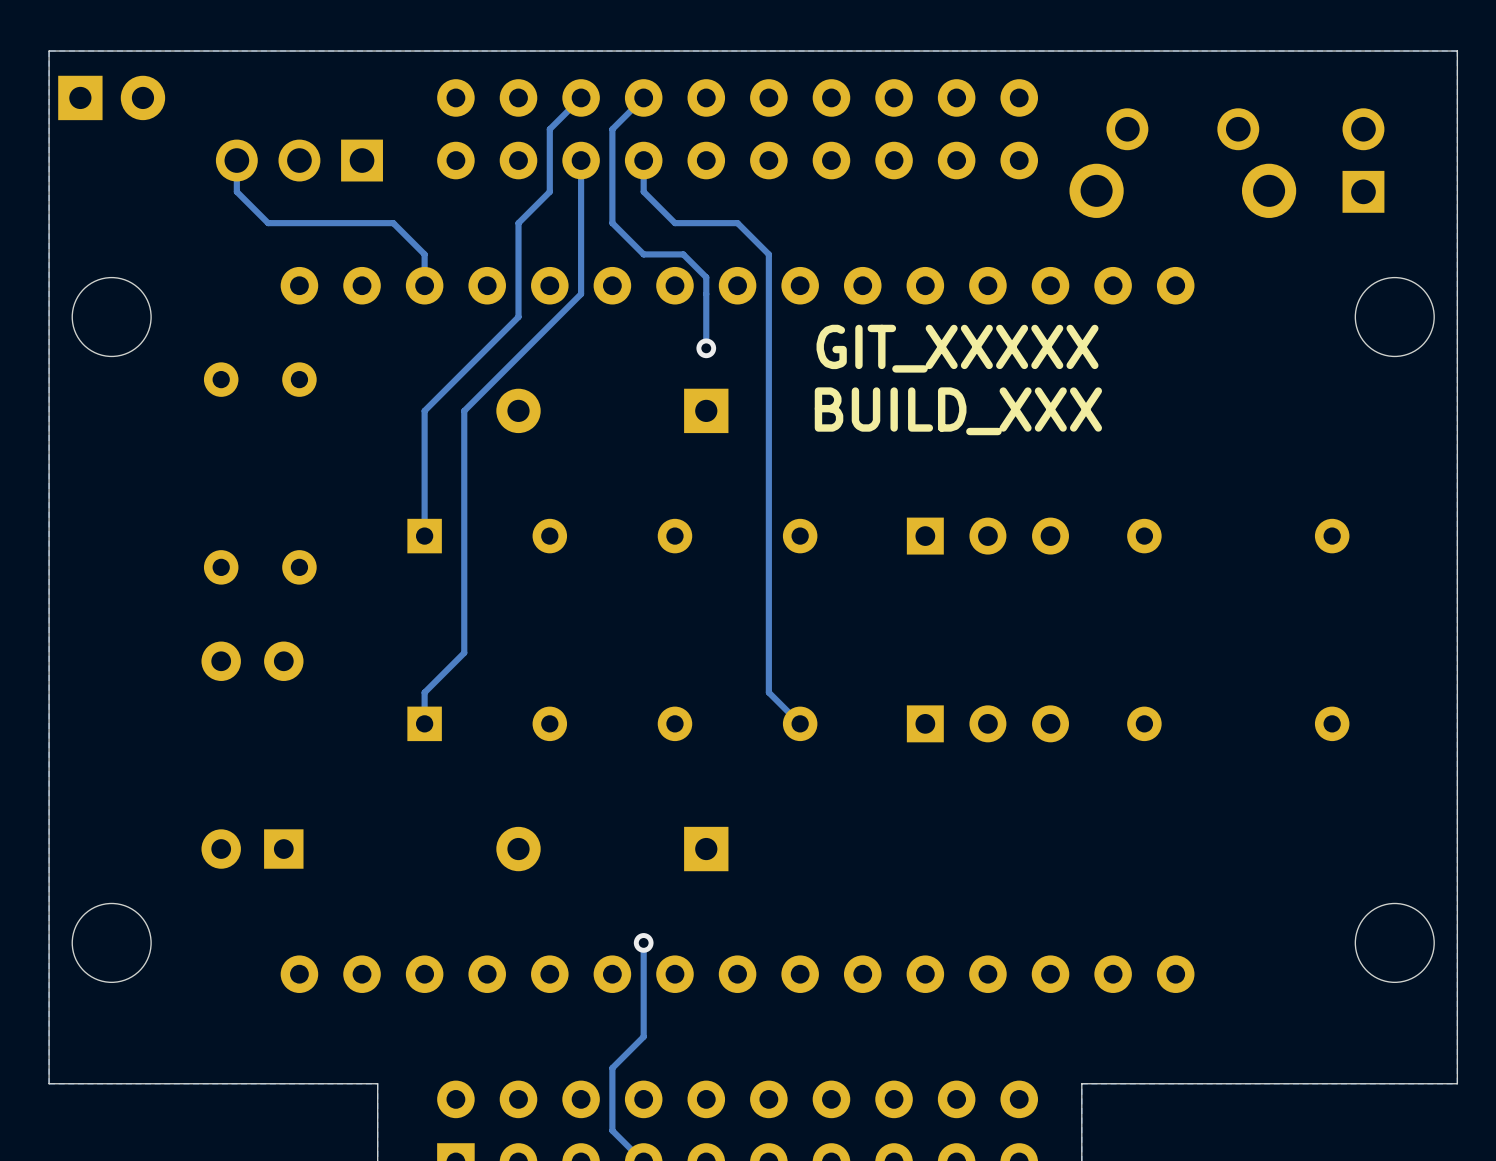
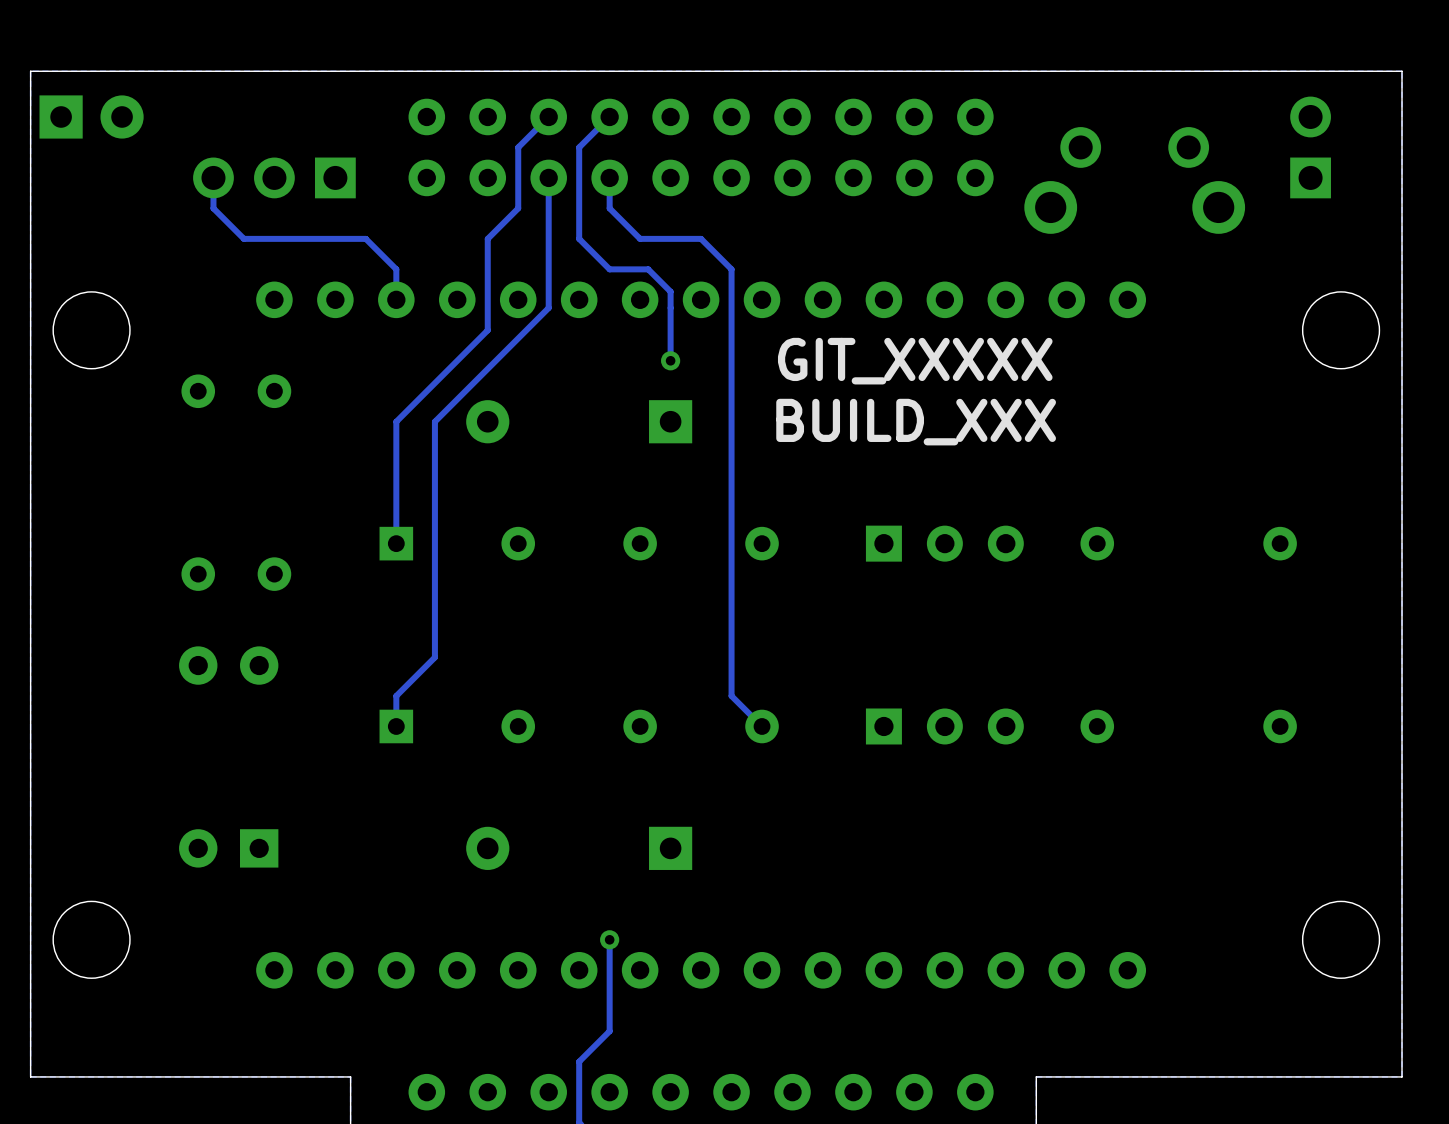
part position: (1363, 160) -> (1310, 147)

